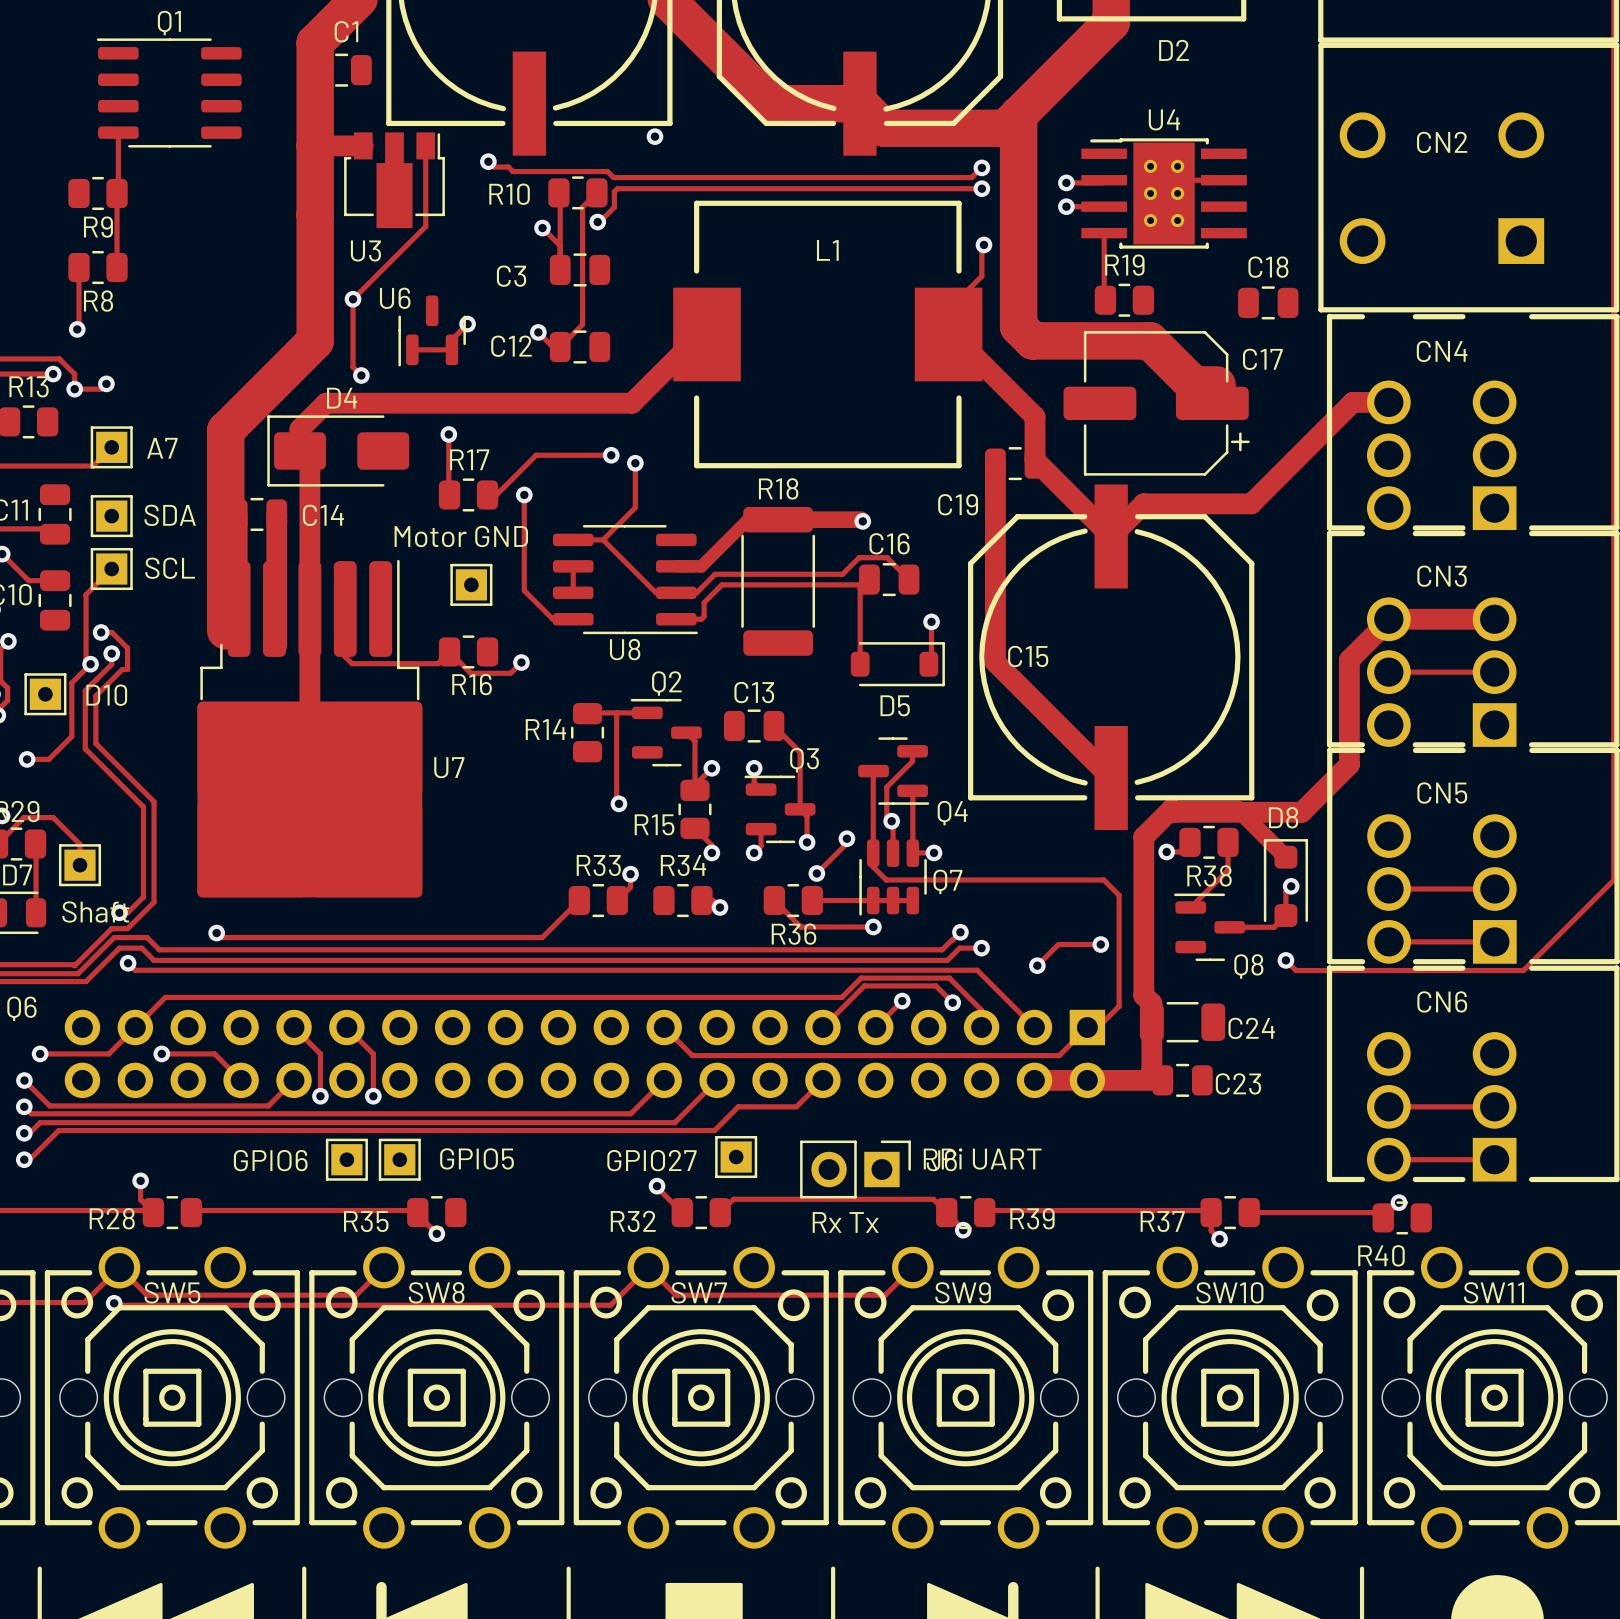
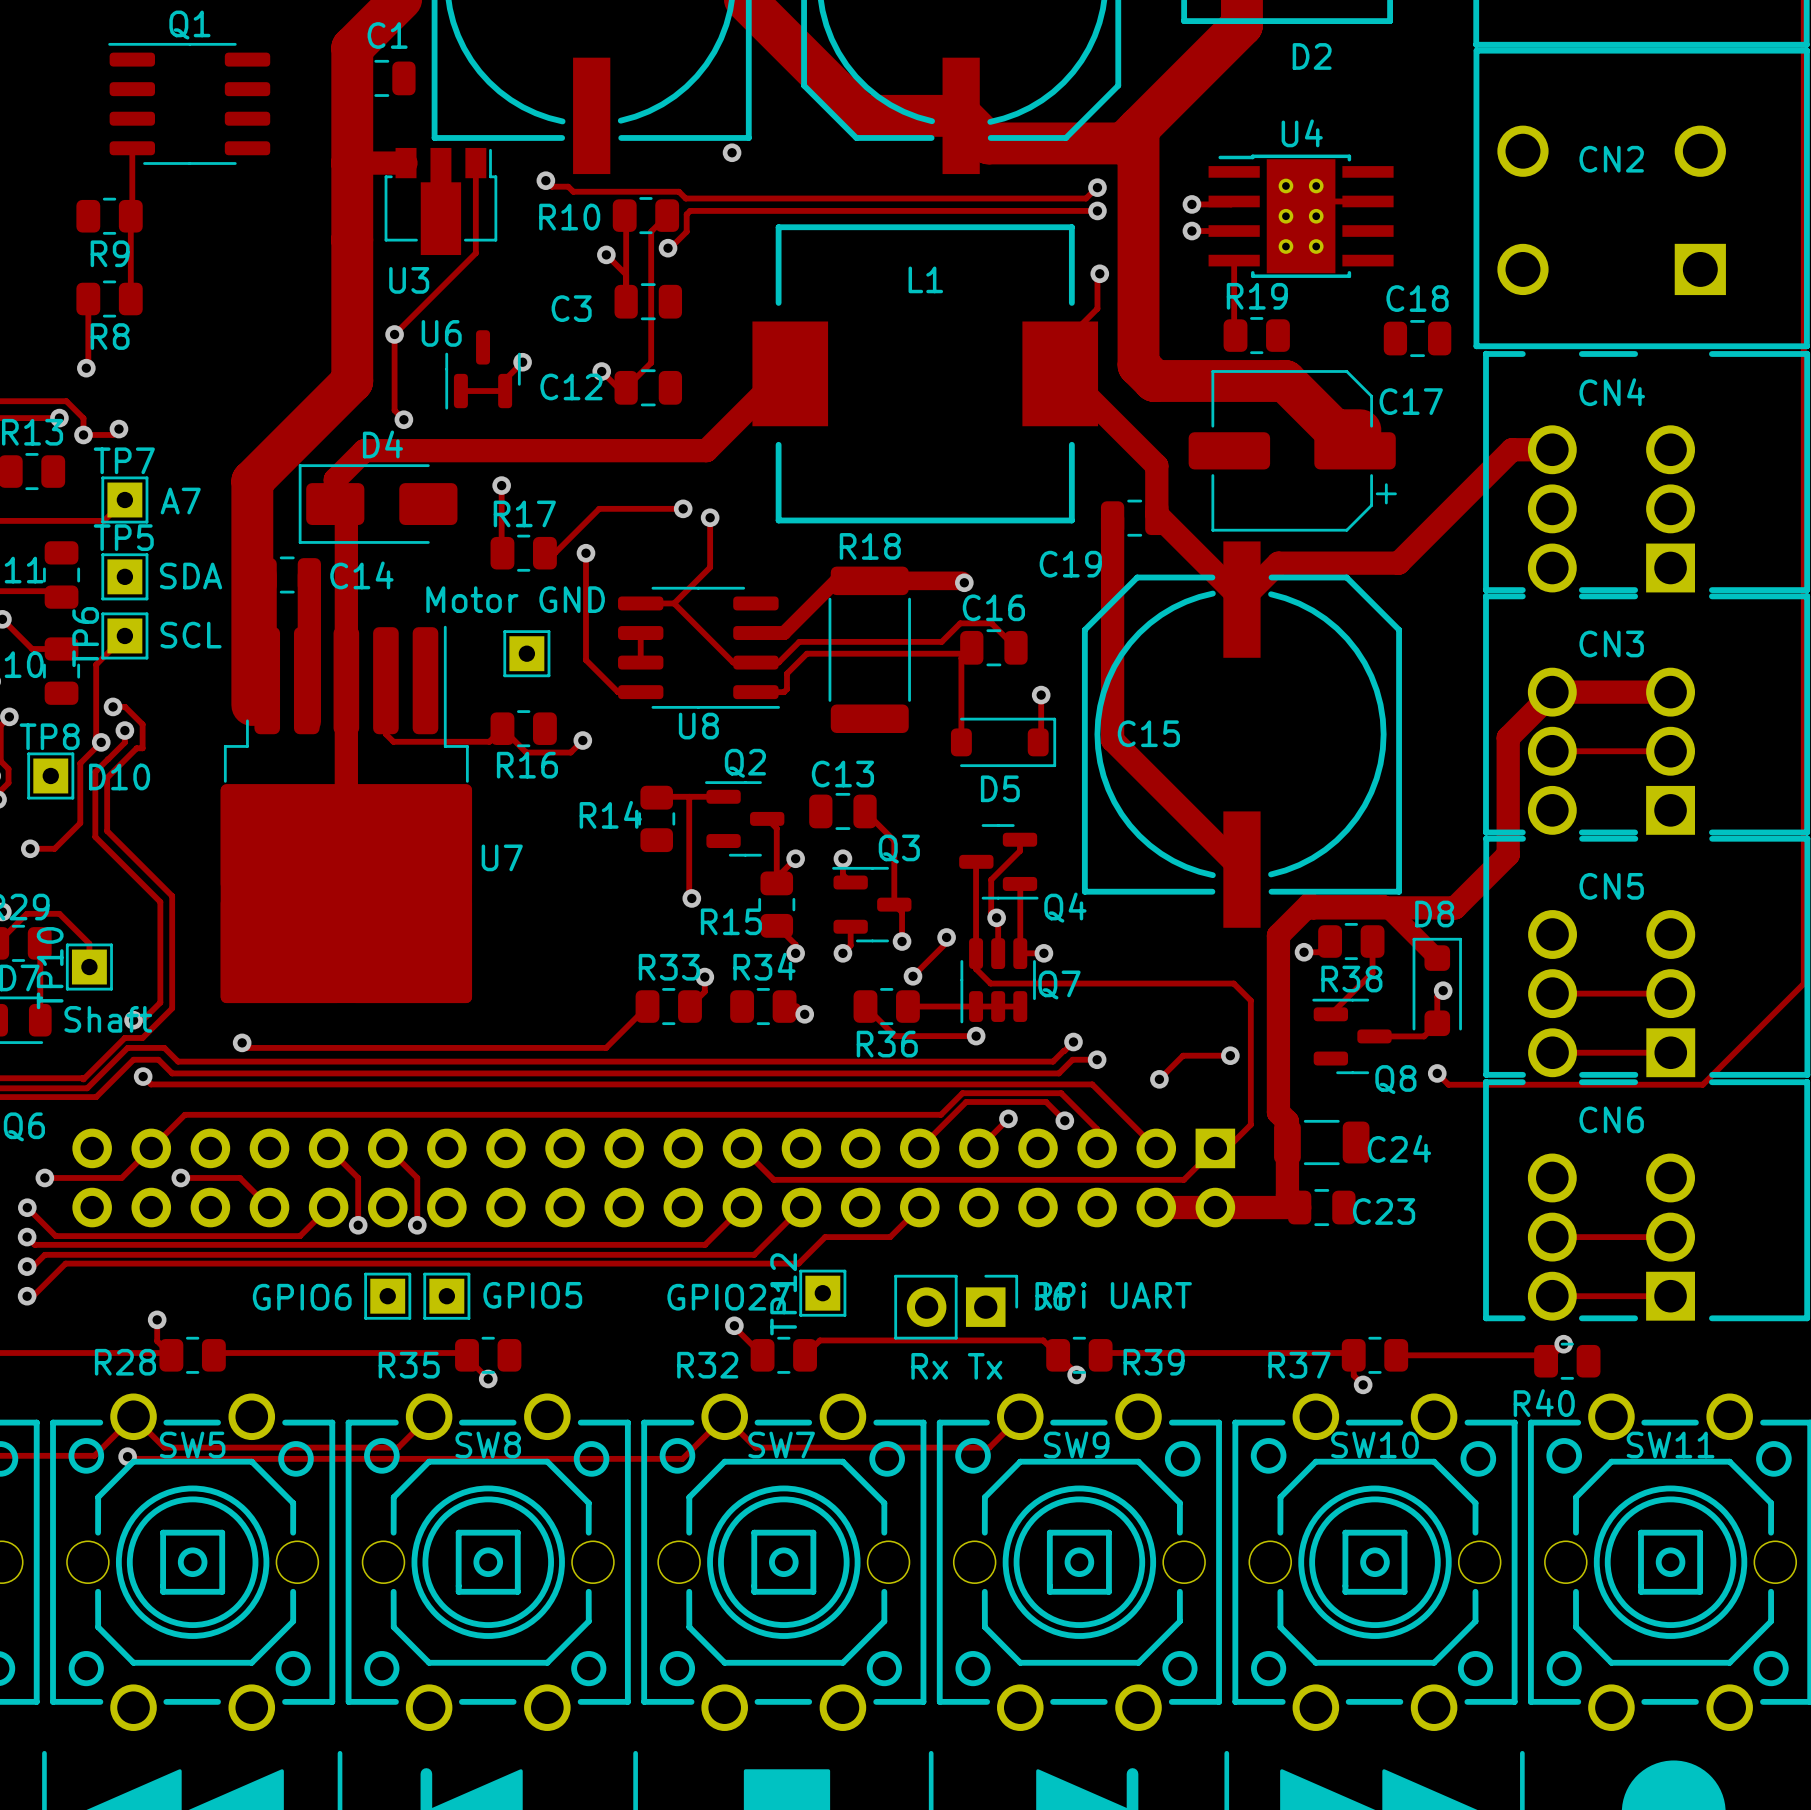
TP7 name: none -> TP7 (124, 460)
TP5 name: none -> TP5 (123, 537)
TP6 name: none -> TP6 (85, 637)
TP8 name: none -> TP8 (49, 736)
TP10 name: none -> TP10 (50, 968)
TP12 name: none -> TP12 (783, 1294)

